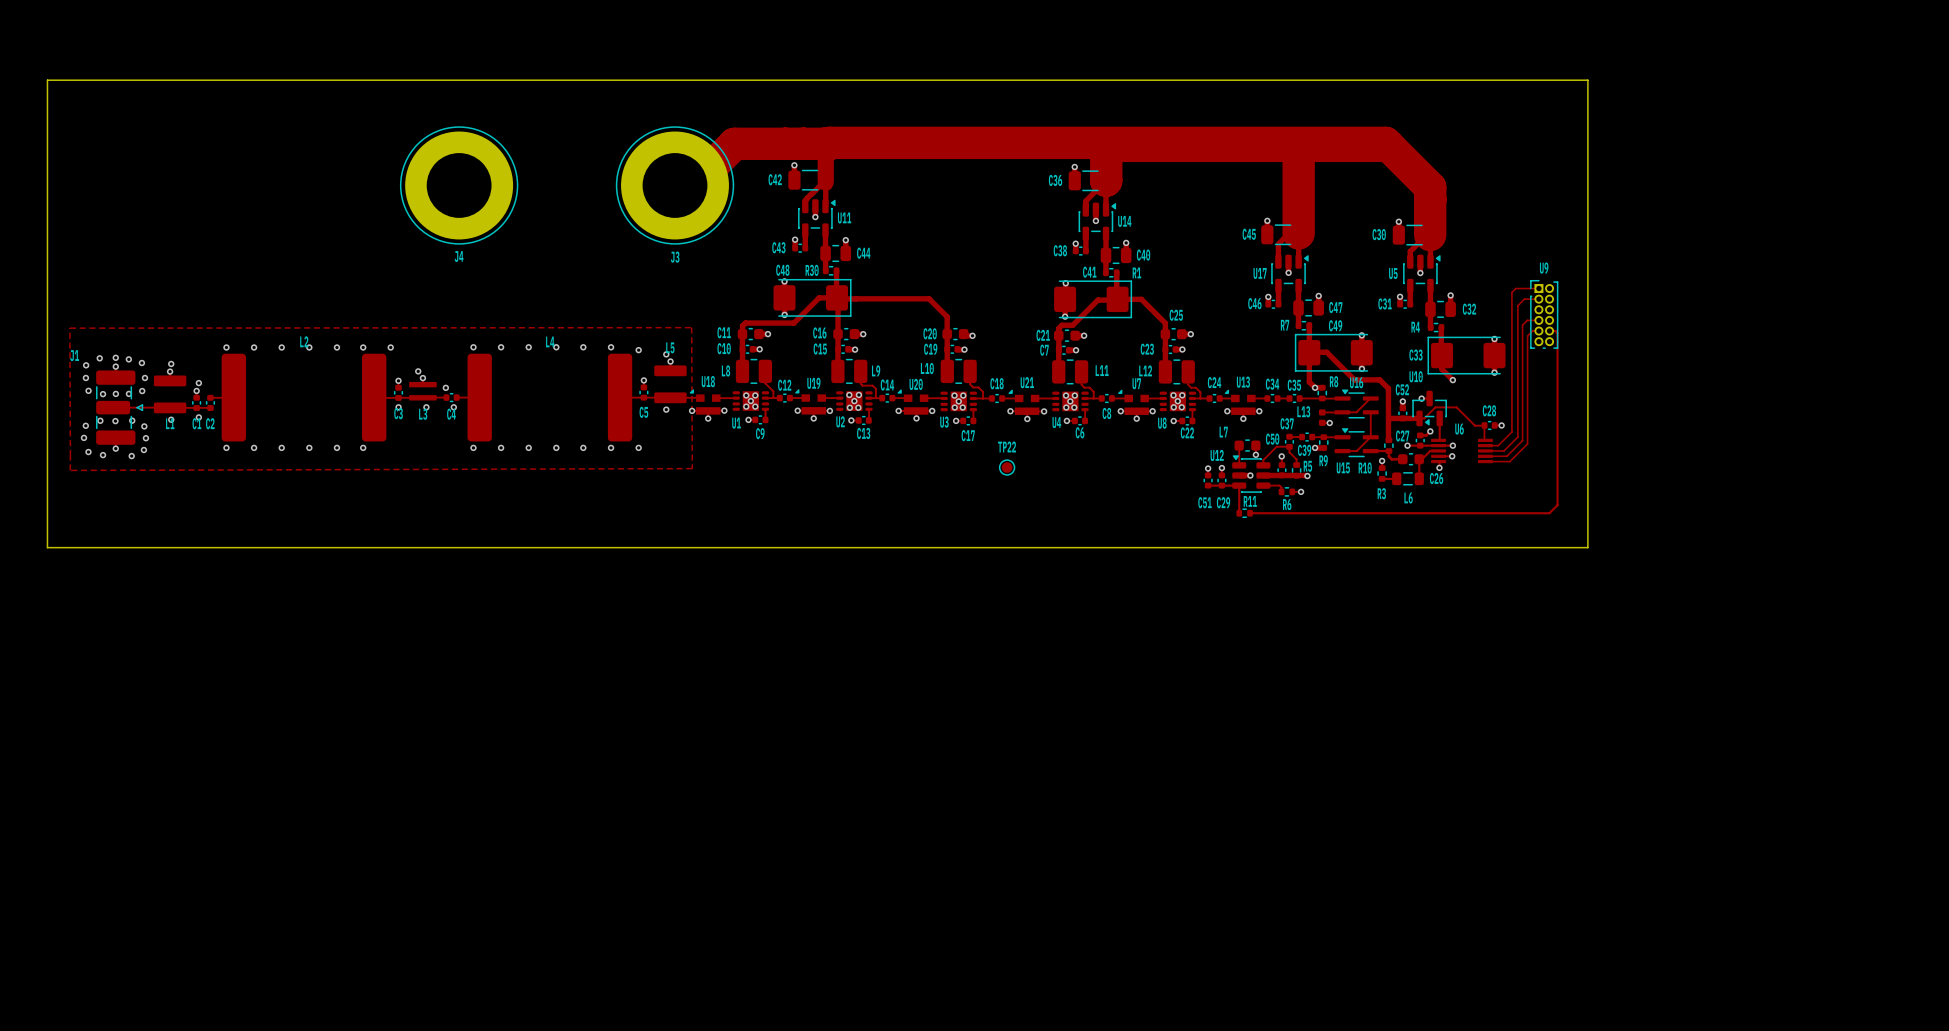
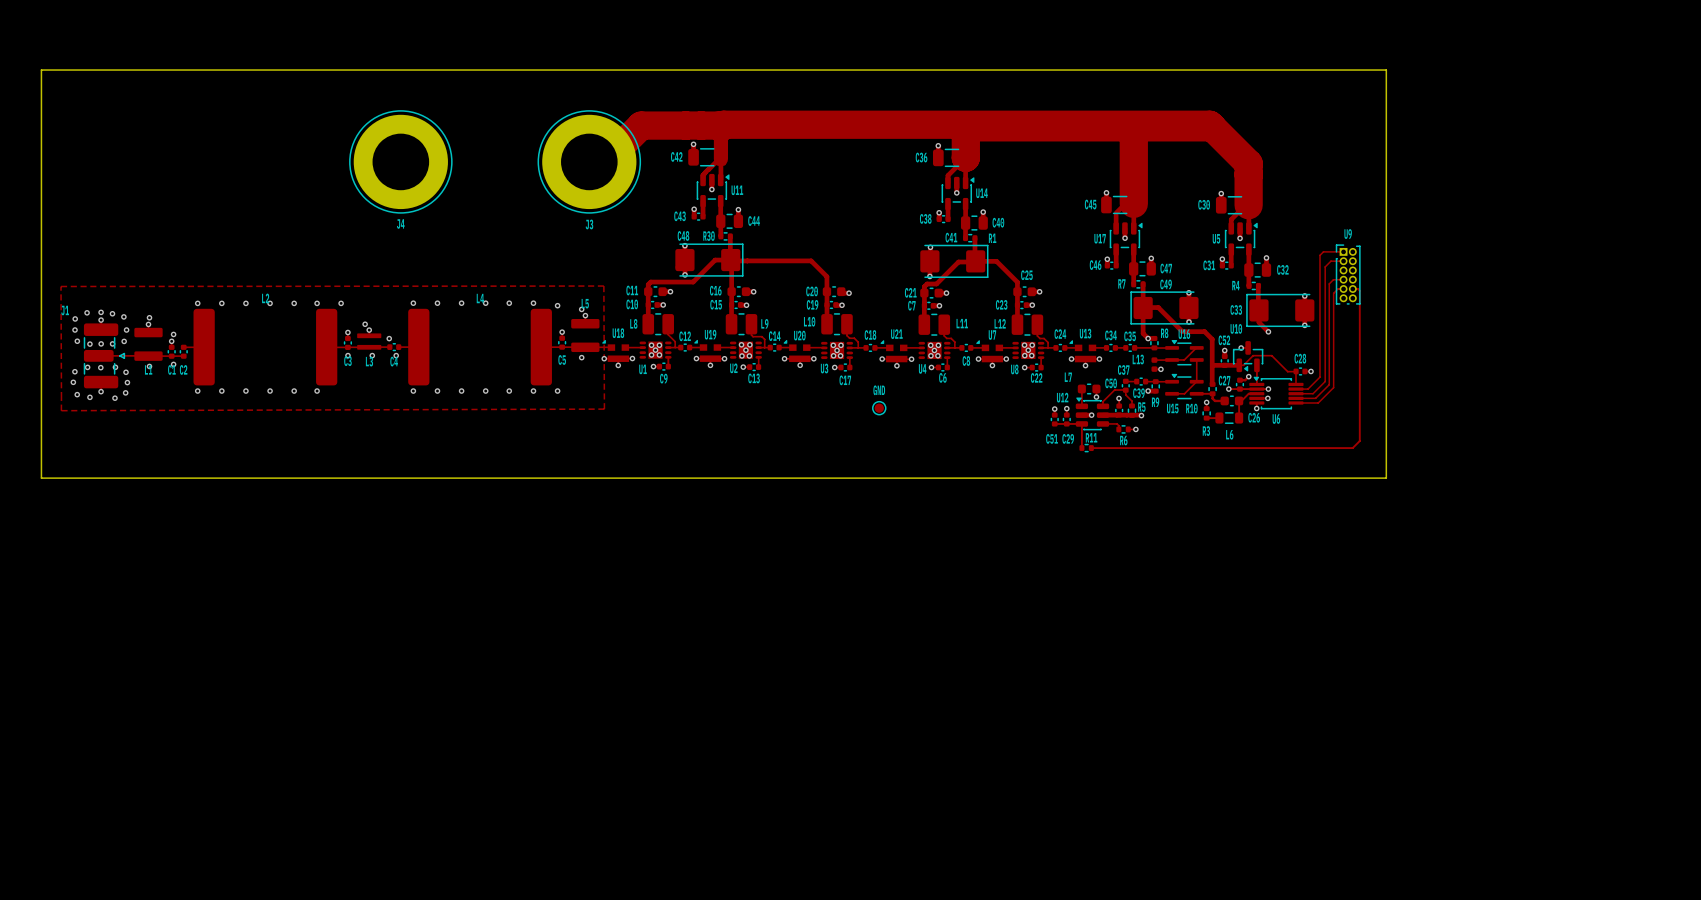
U6 name position: U6 (1459, 429) -> U6 (1276, 419)
U6 footprint: [1431, 438, 1493, 464] -> [1249, 376, 1304, 410]
TP22 name: TP22 (1007, 446) -> GND (879, 390)

